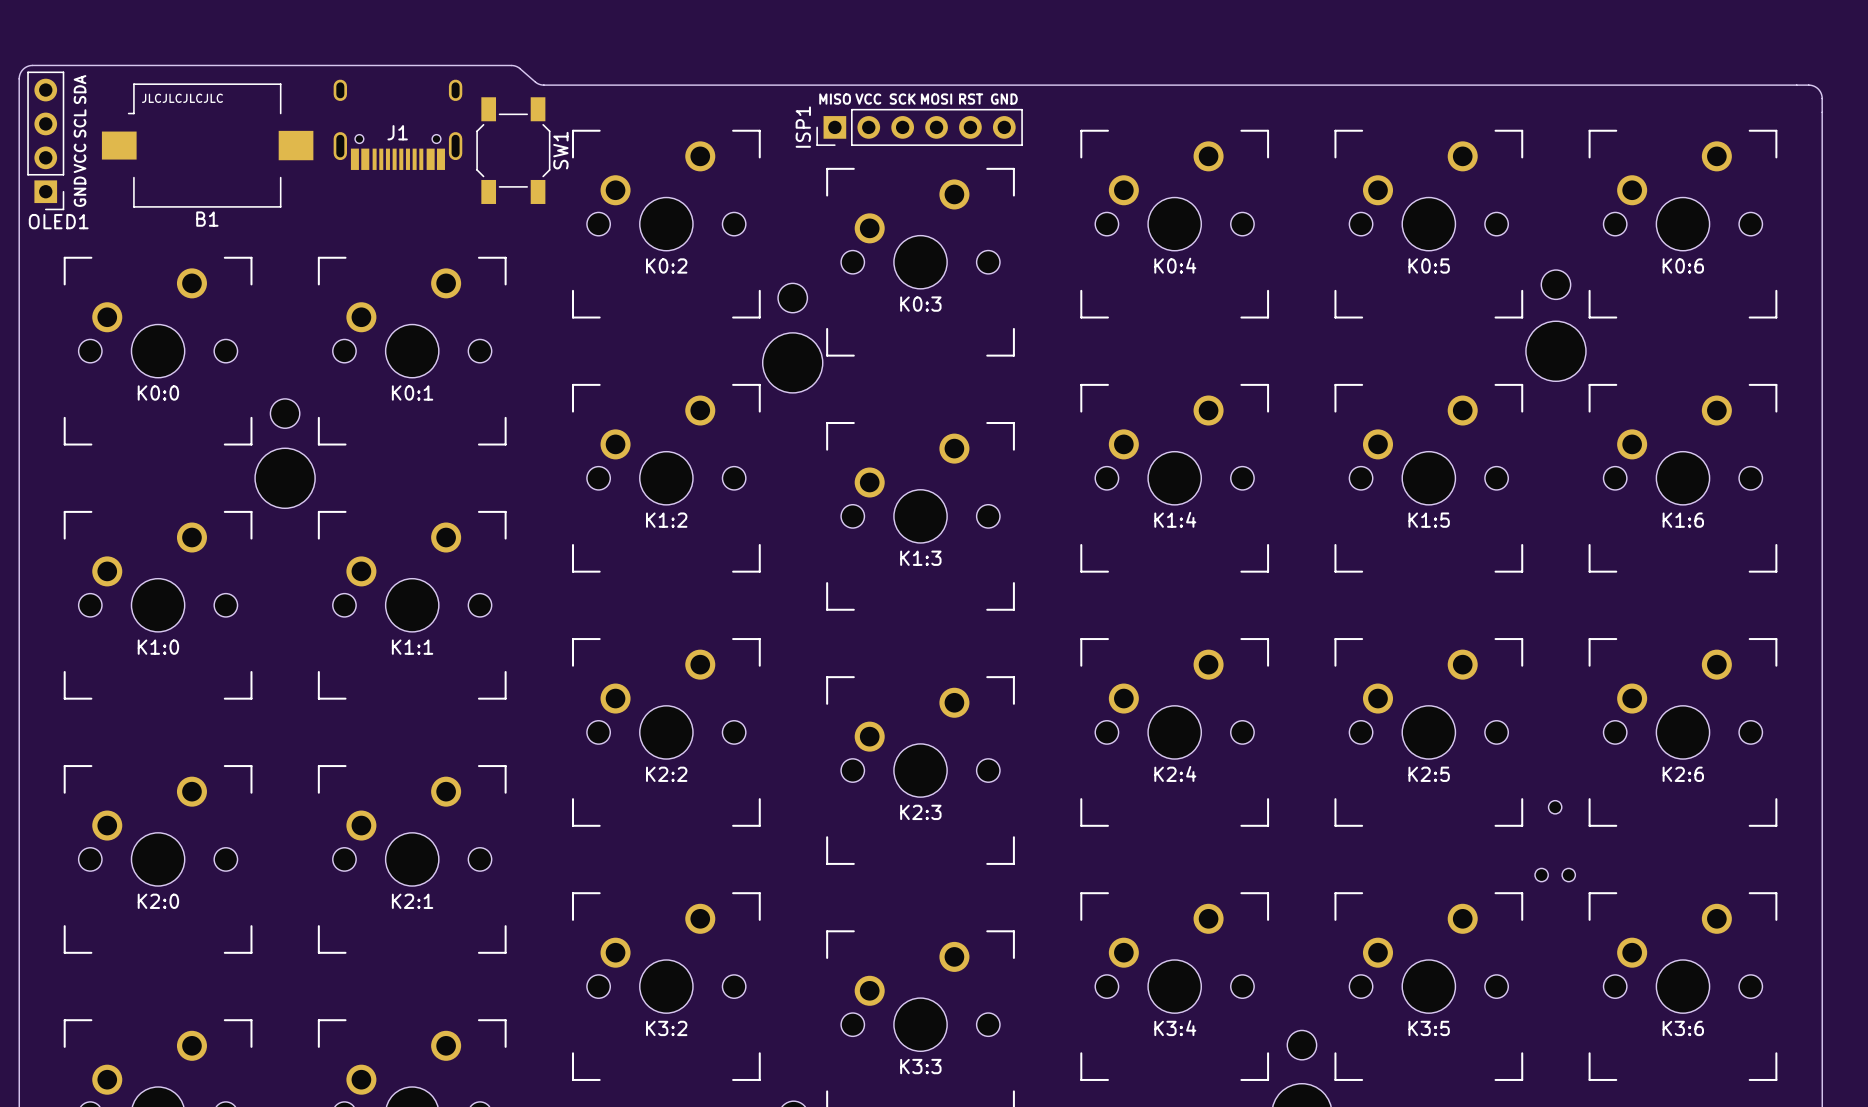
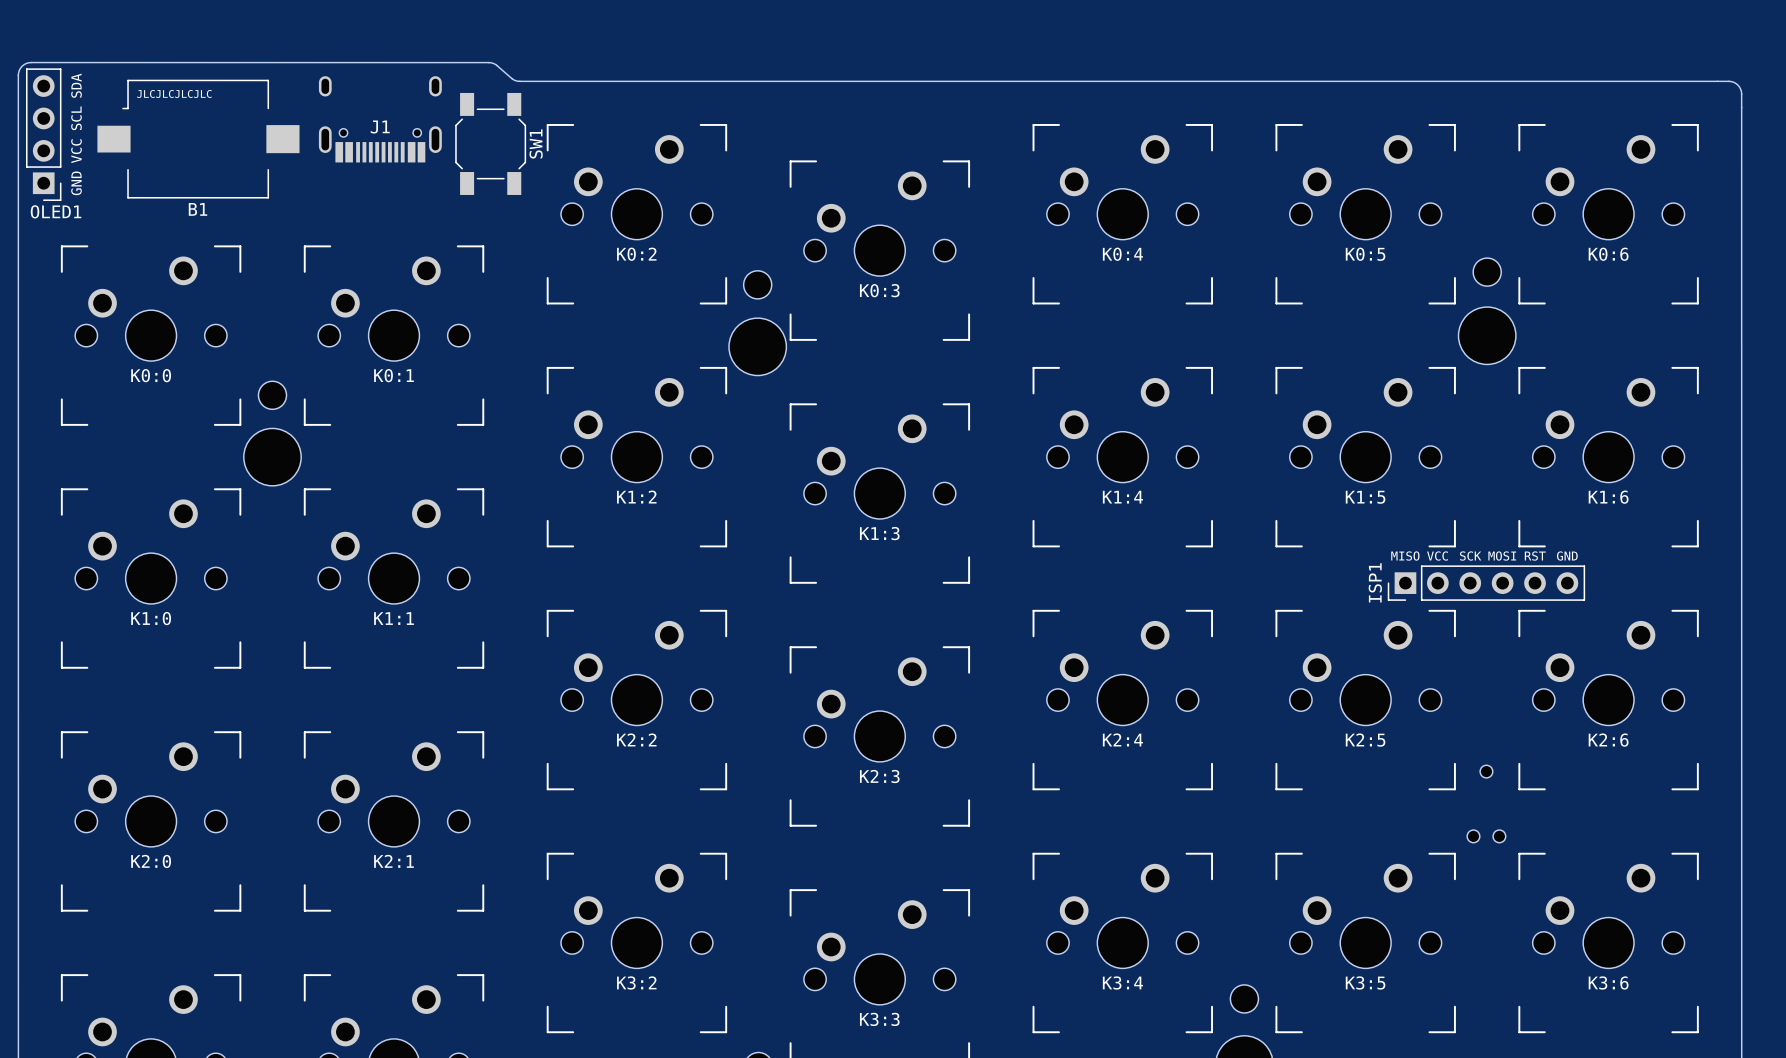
ISP1 position: (919, 127) -> (1486, 583)

